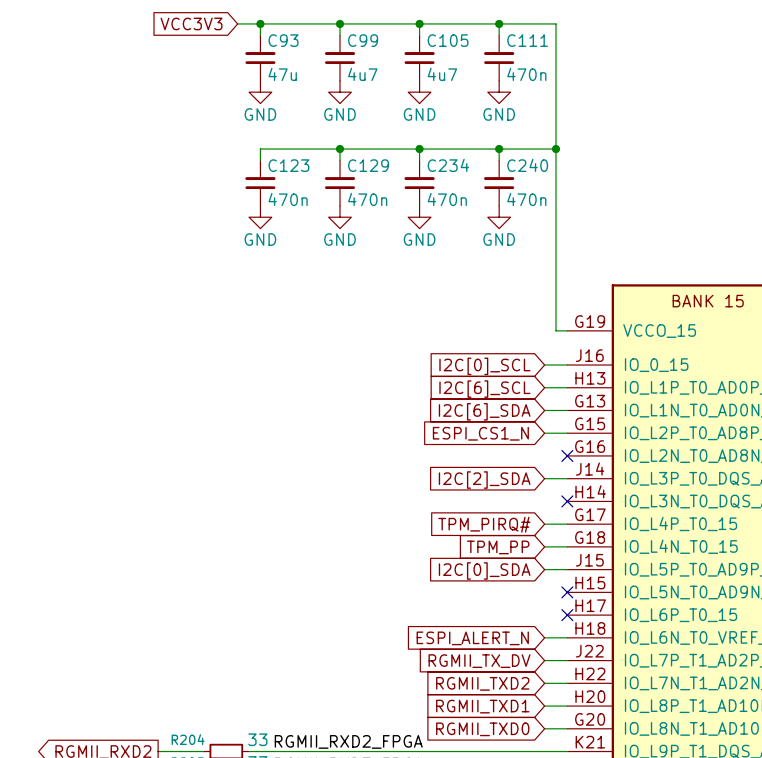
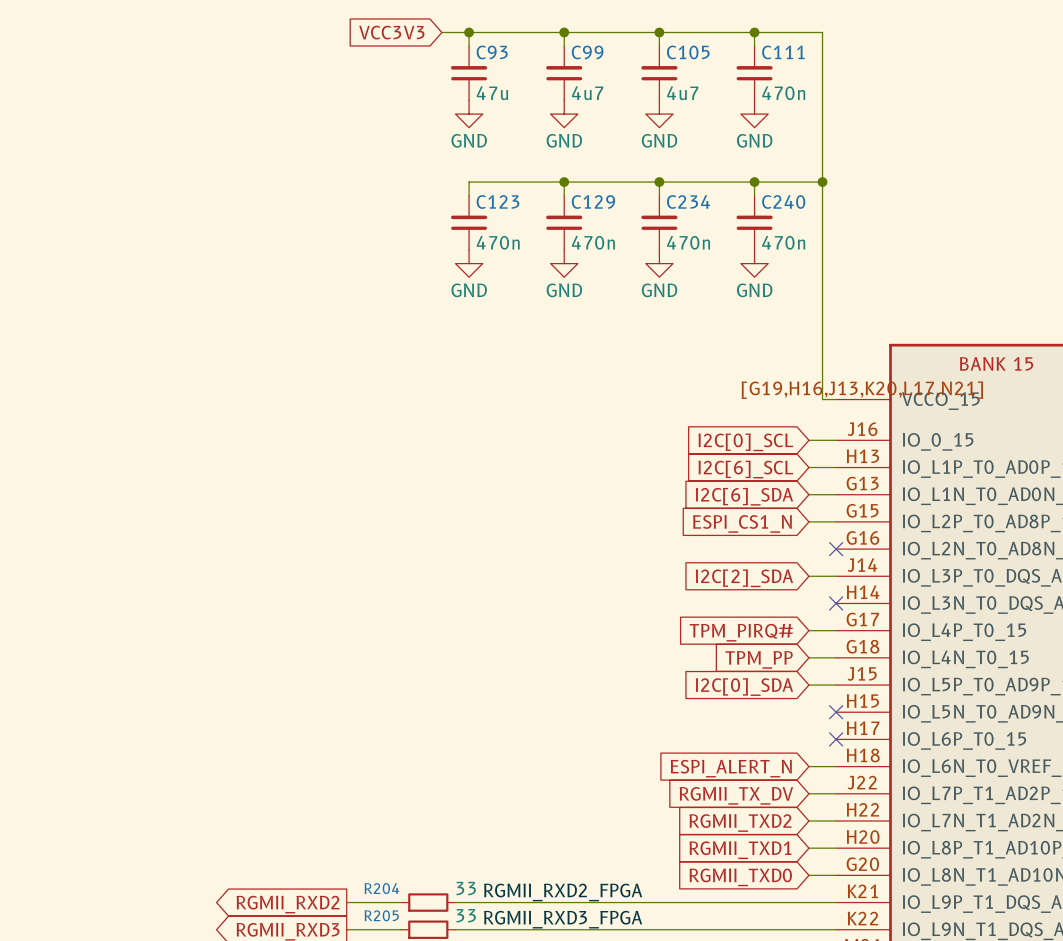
part pin number: G19 (590, 321) -> [G19,H16,J13,K20,L17,N21] (862, 390)

